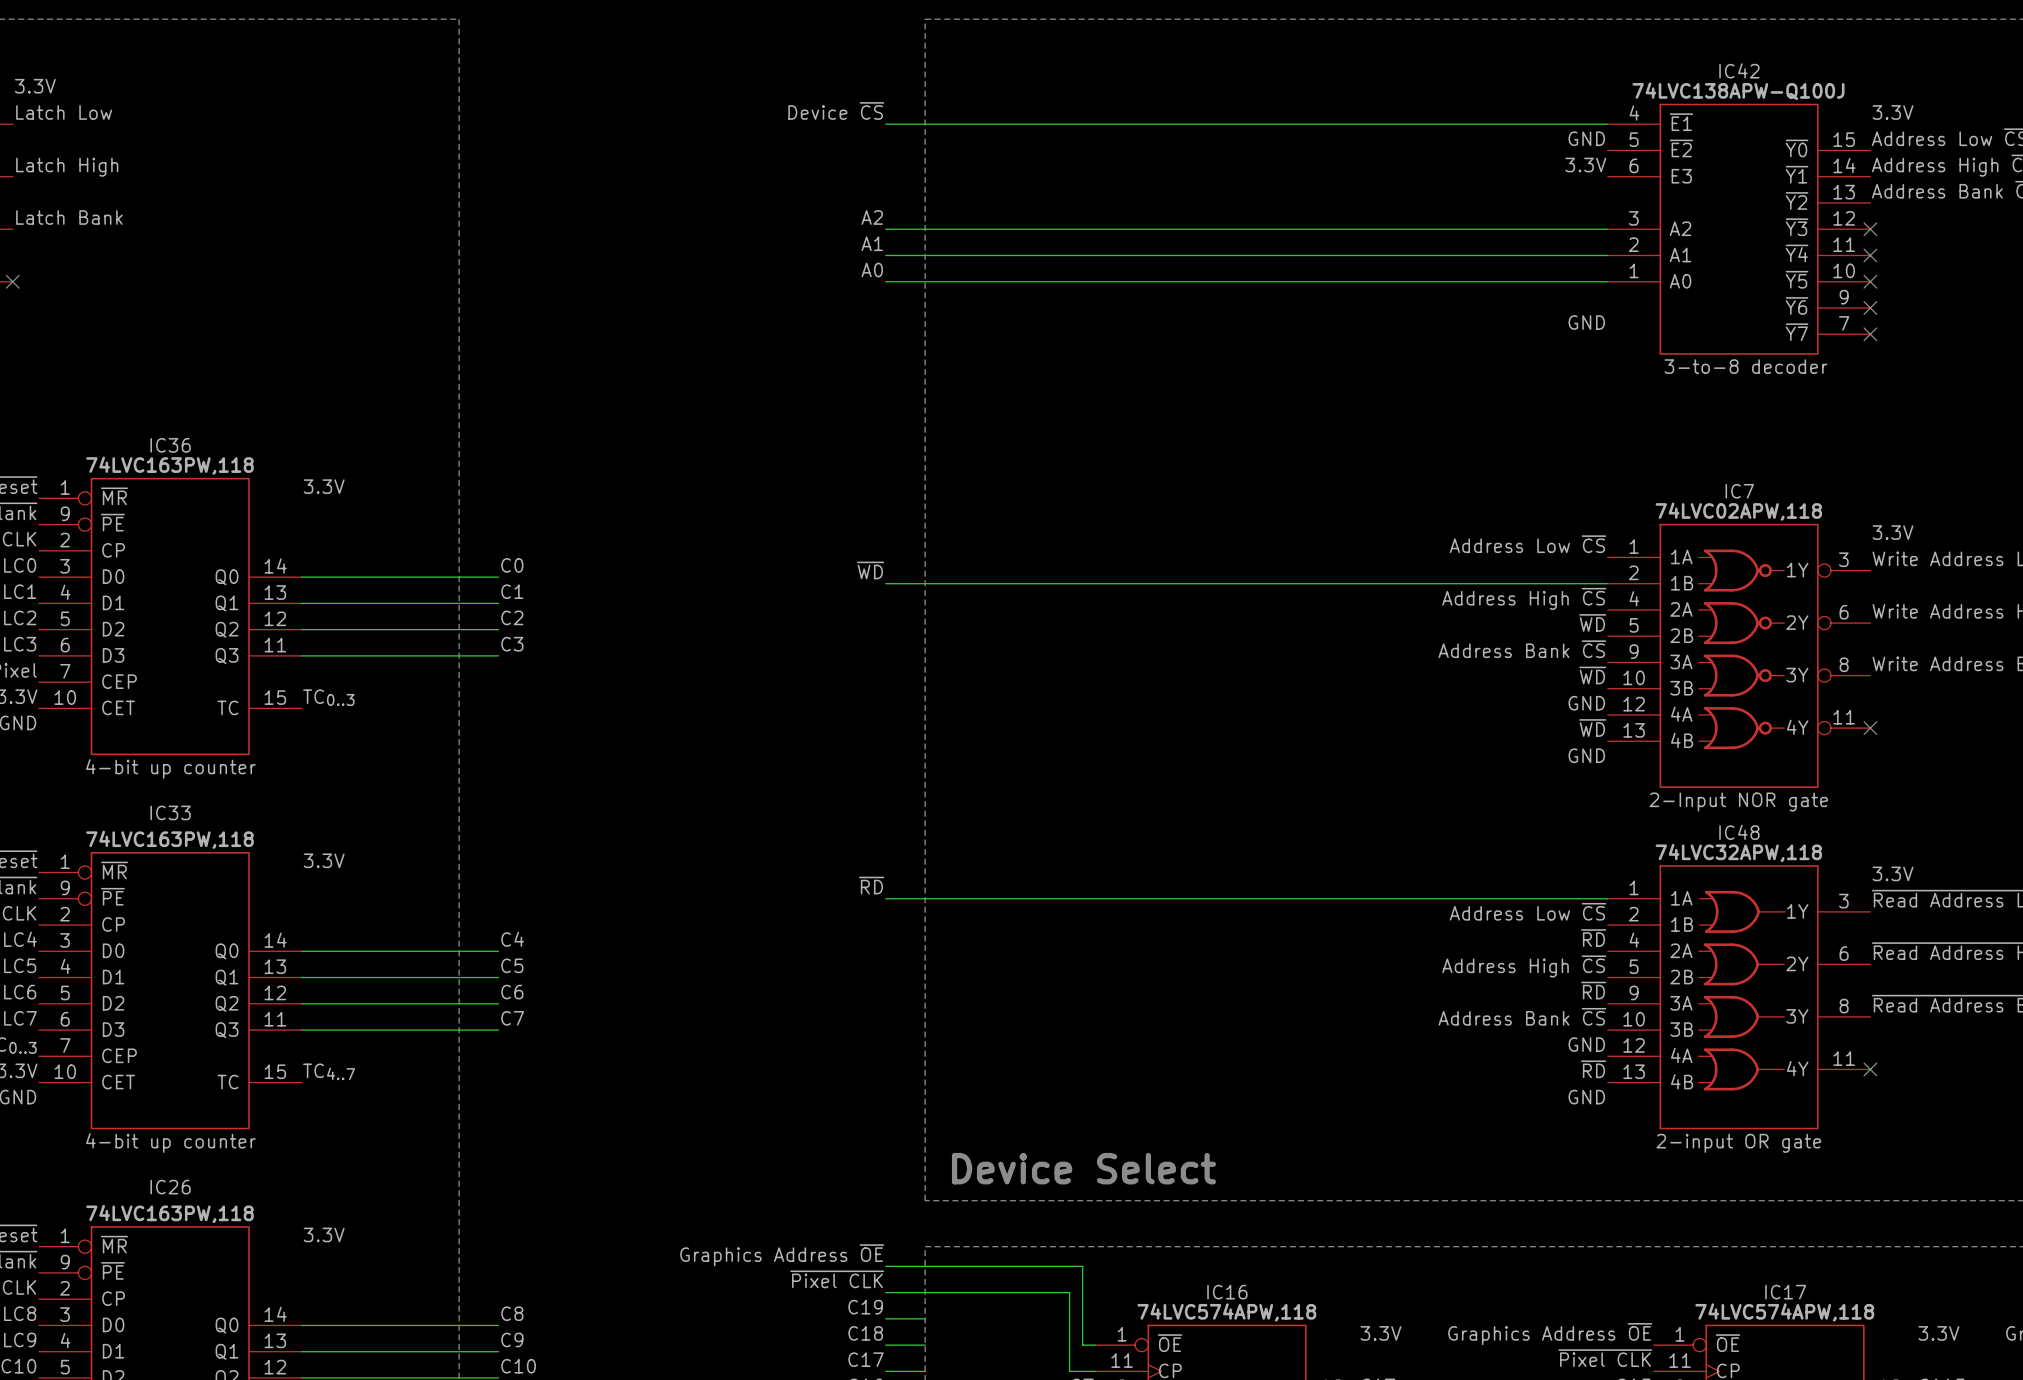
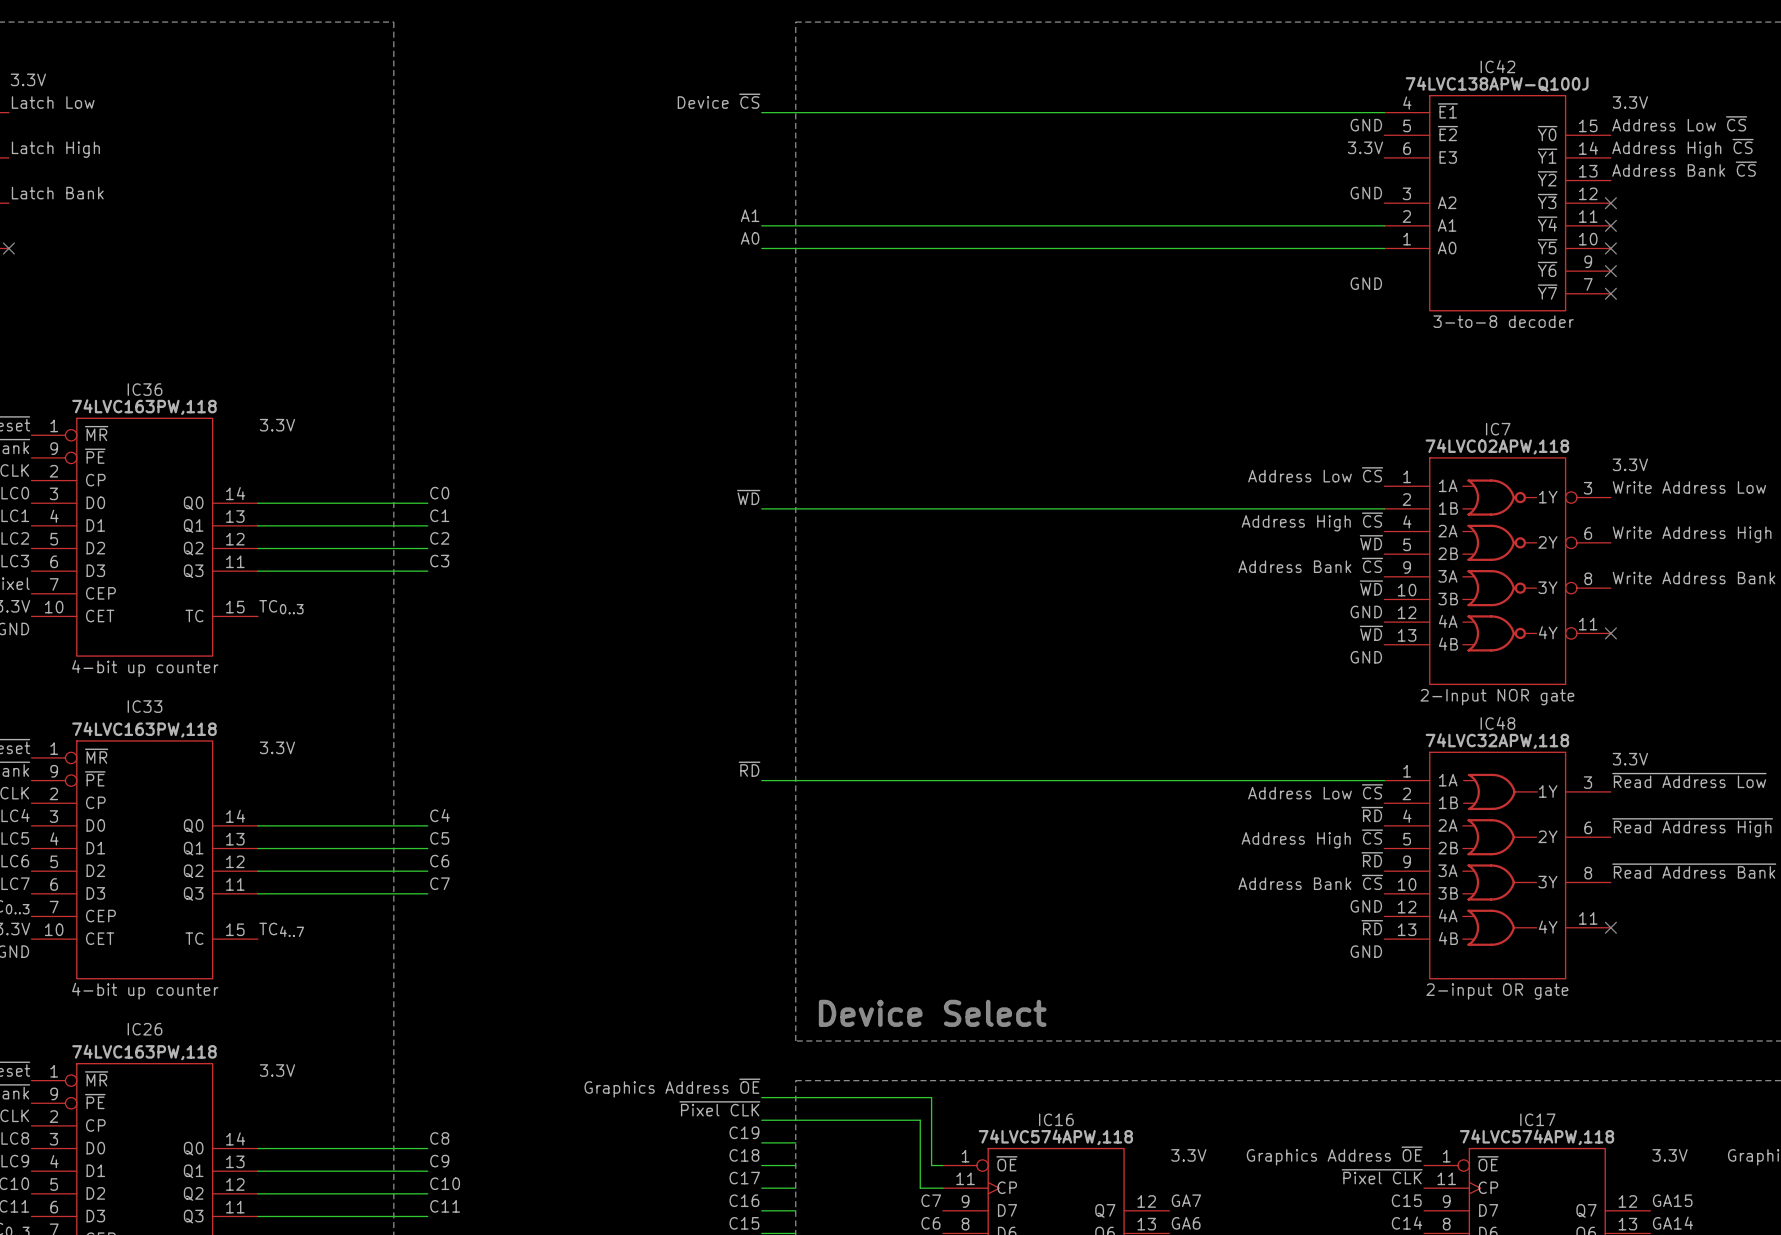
label: A2 (872, 217) -> none
label: none -> GND (1366, 193)
wire: (885, 229) (1607, 229) -> none

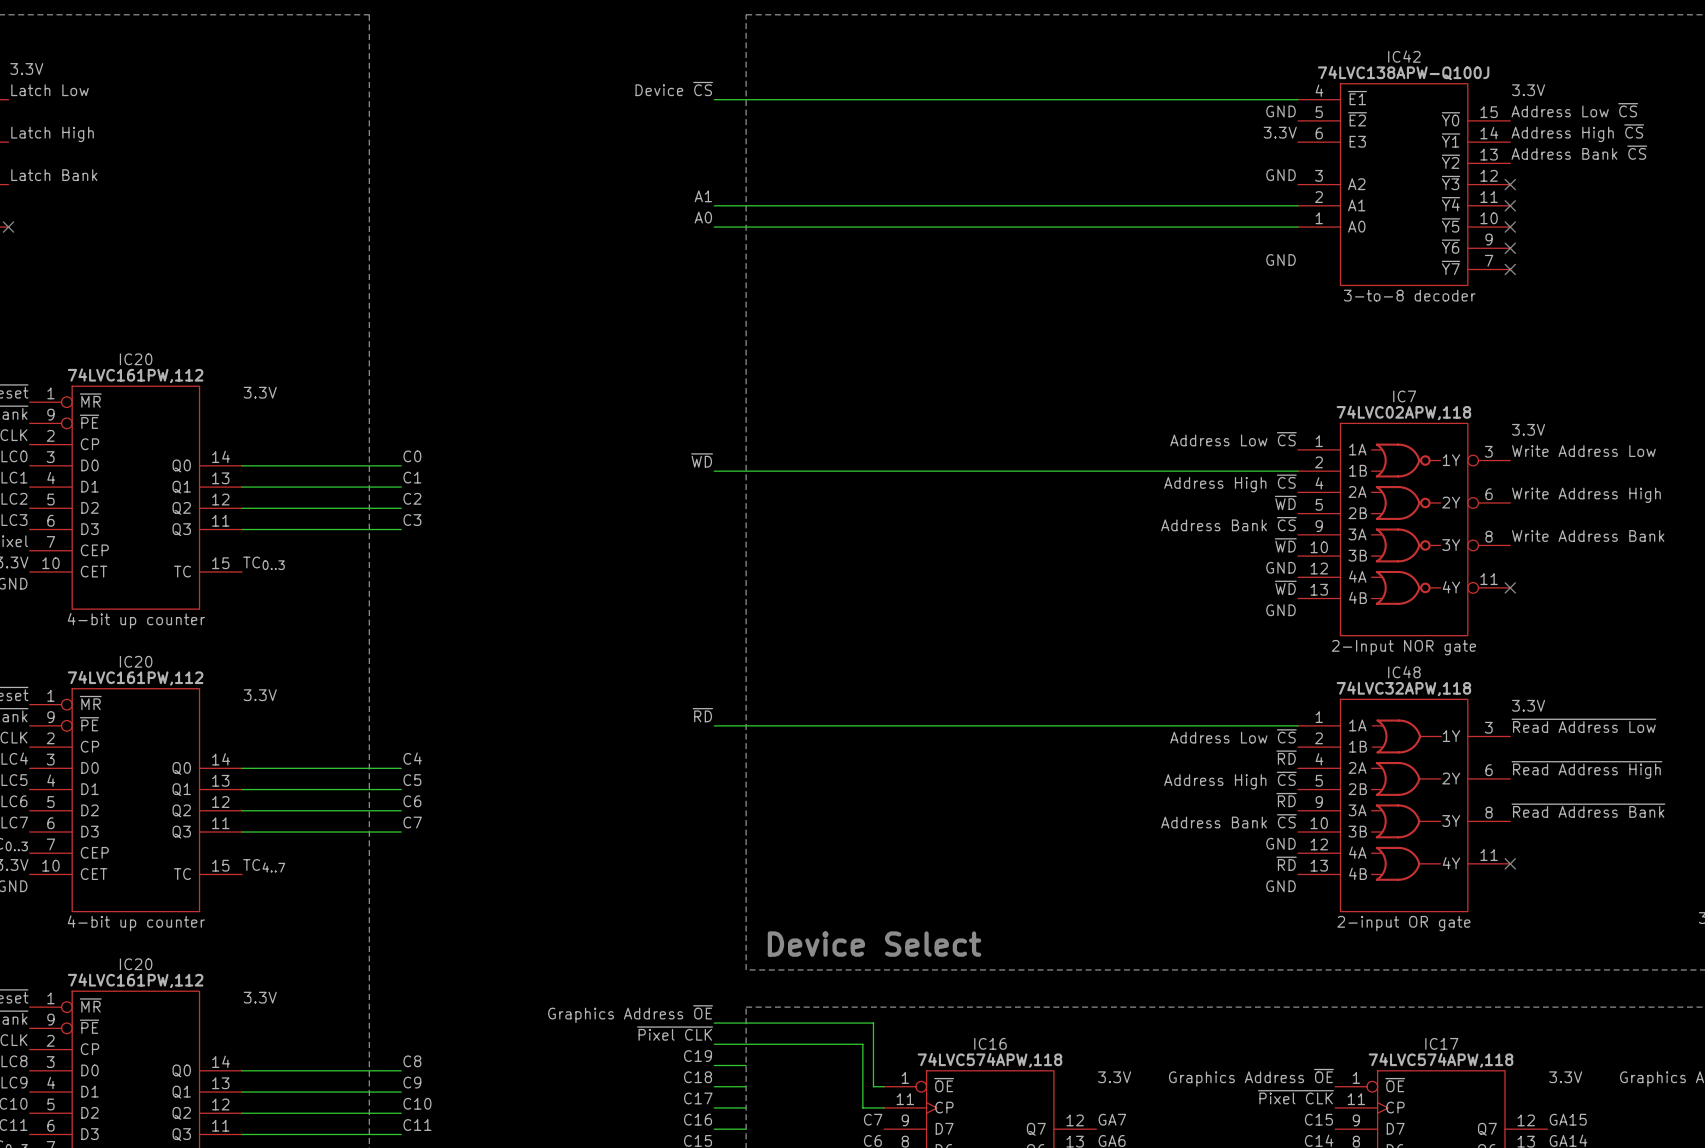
IC36 name: IC36 (145, 389) -> IC20 (136, 359)
IC36 value: 74LVC163PW,118 (144, 407) -> 74LVC161PW,112 (135, 375)
IC33 name: IC33 (145, 706) -> IC20 (136, 661)
IC33 value: 74LVC163PW,118 (144, 729) -> 74LVC161PW,112 (135, 678)
IC26 name: IC26 (145, 1029) -> IC20 (136, 964)
IC26 value: 74LVC163PW,118 (144, 1052) -> 74LVC161PW,112 (135, 980)

